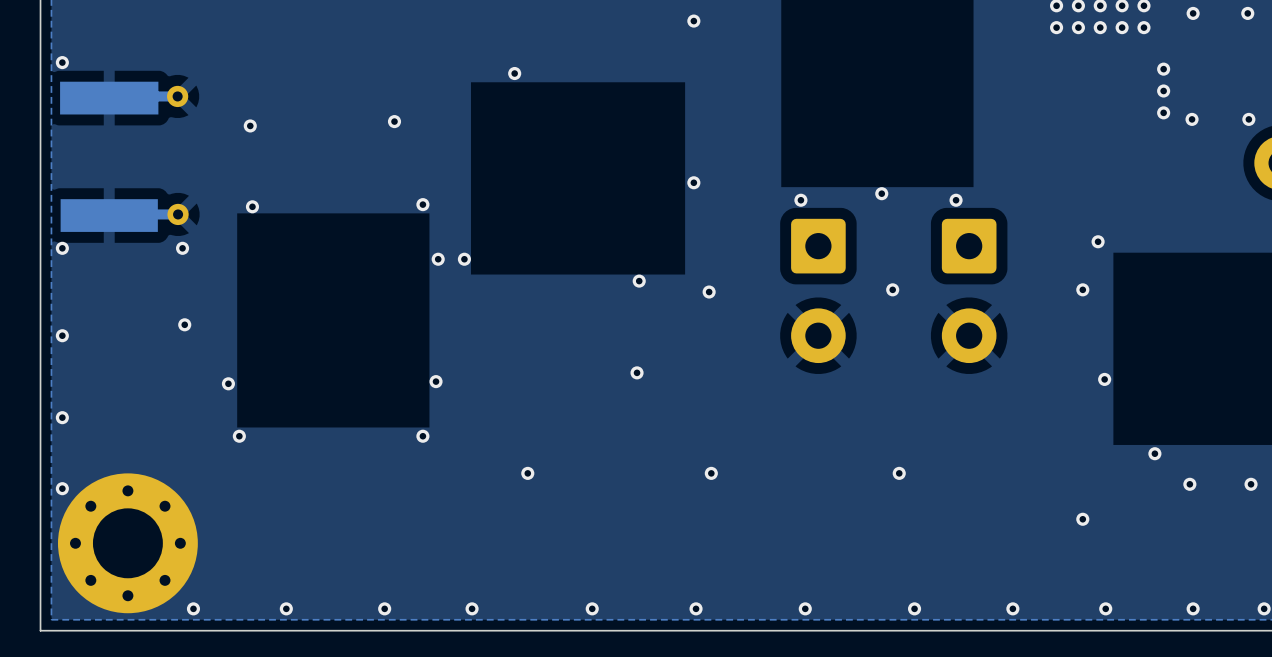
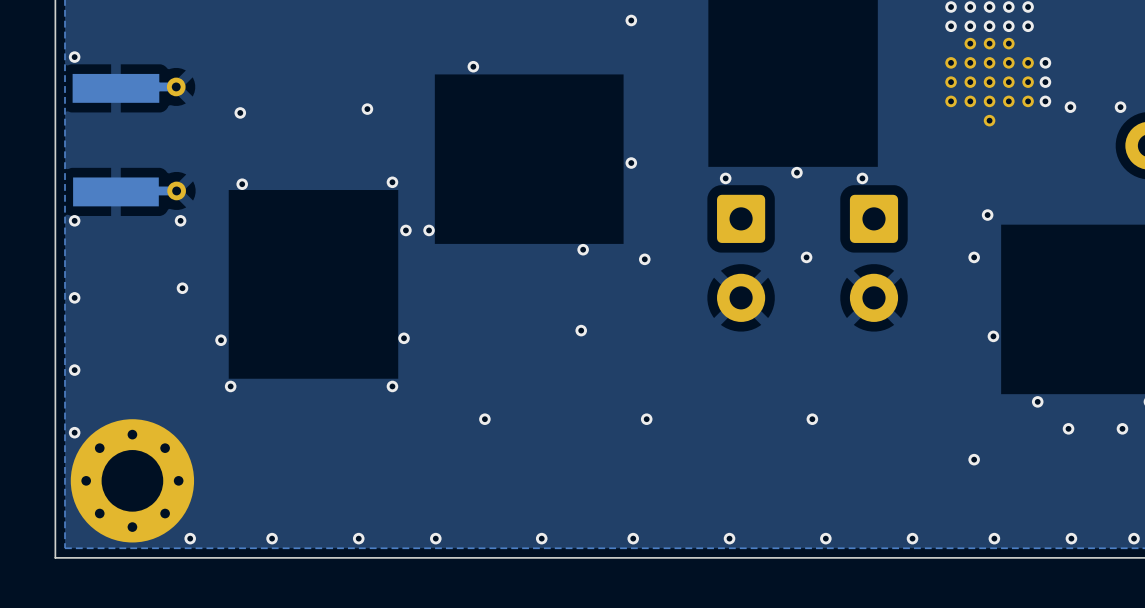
via: (1193, 13) -> none
via: (1247, 13) -> none
part: none -> (989, 82)

